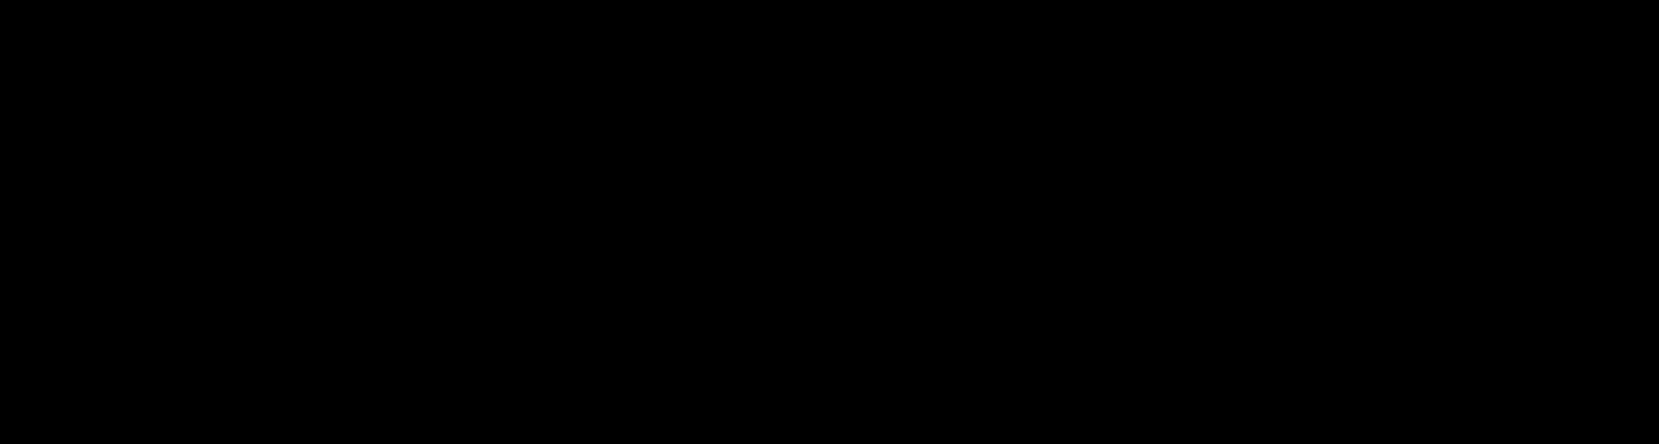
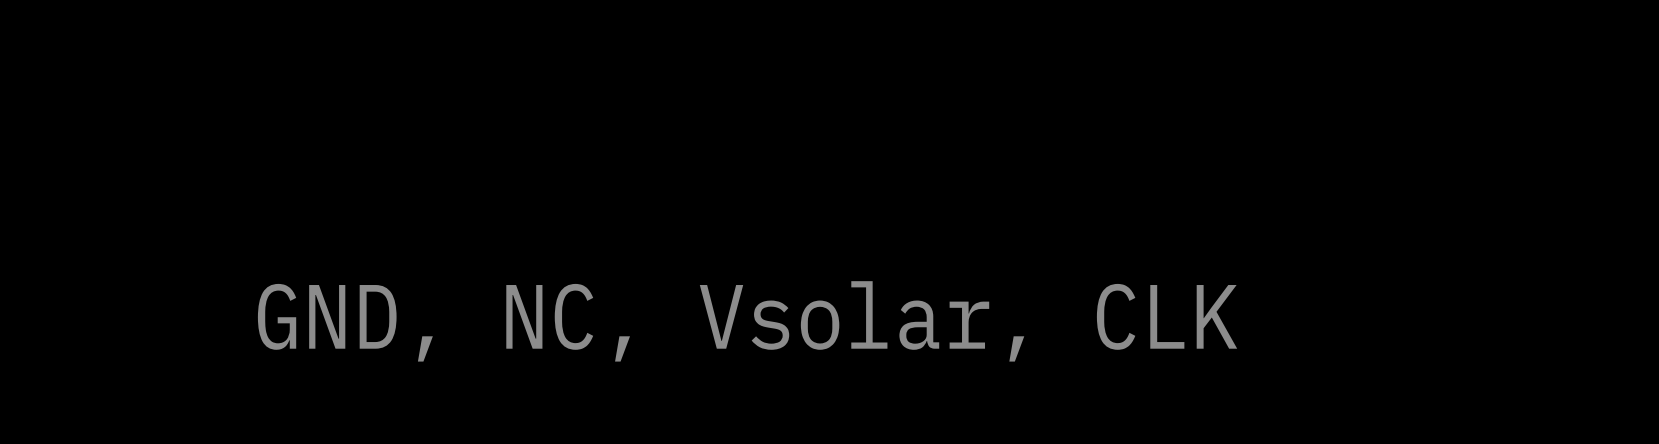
text: none -> GND, NC, Vsolar, CLK (747, 321)

